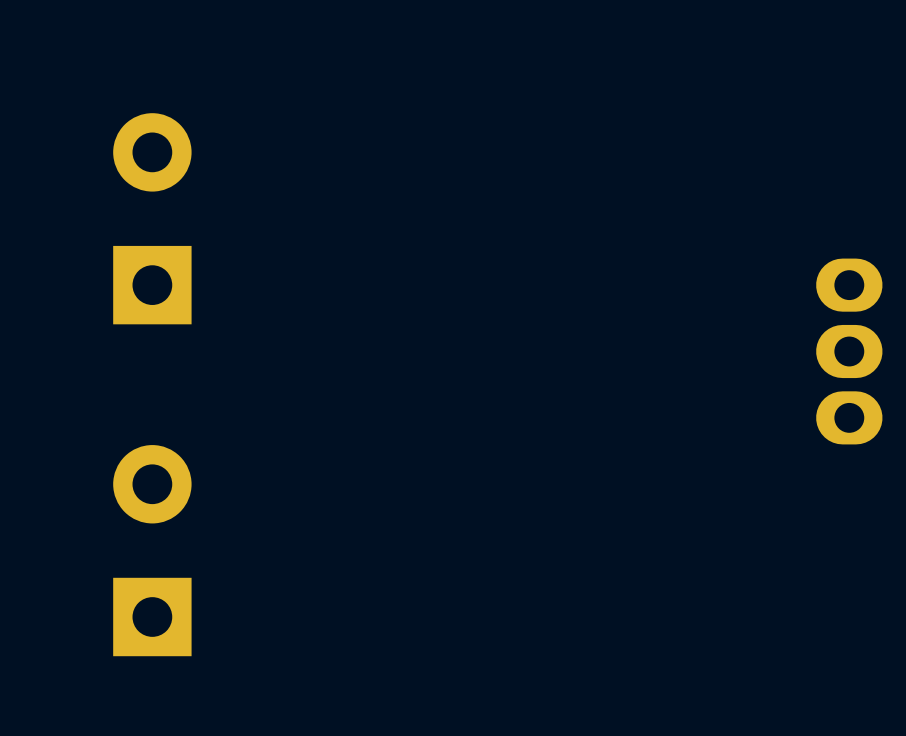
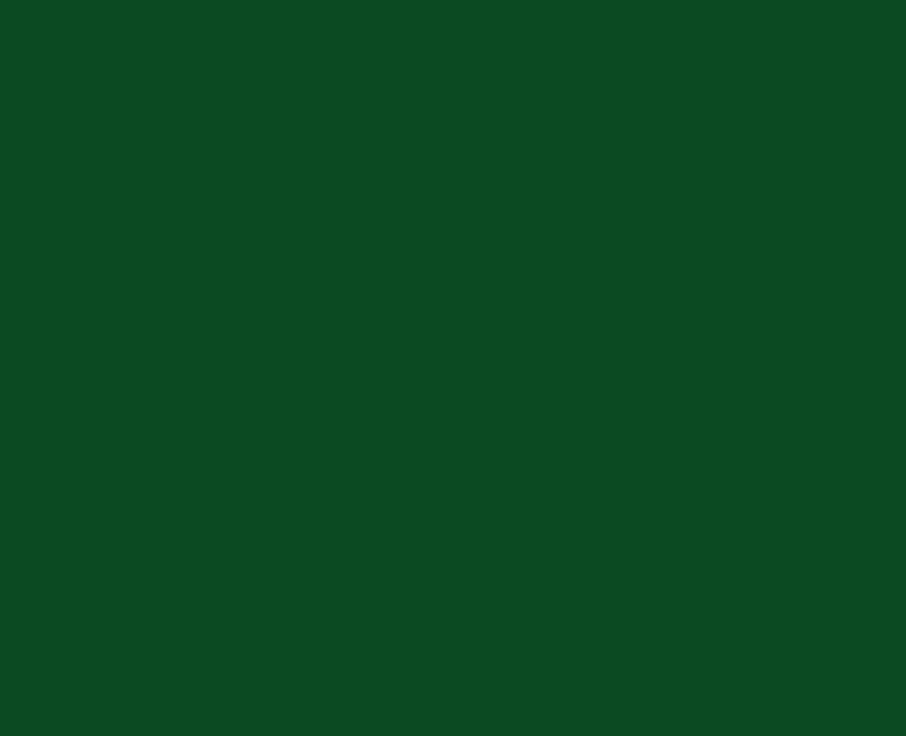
part: (152, 218) -> none
part: (849, 351) -> none
part: (152, 550) -> none

